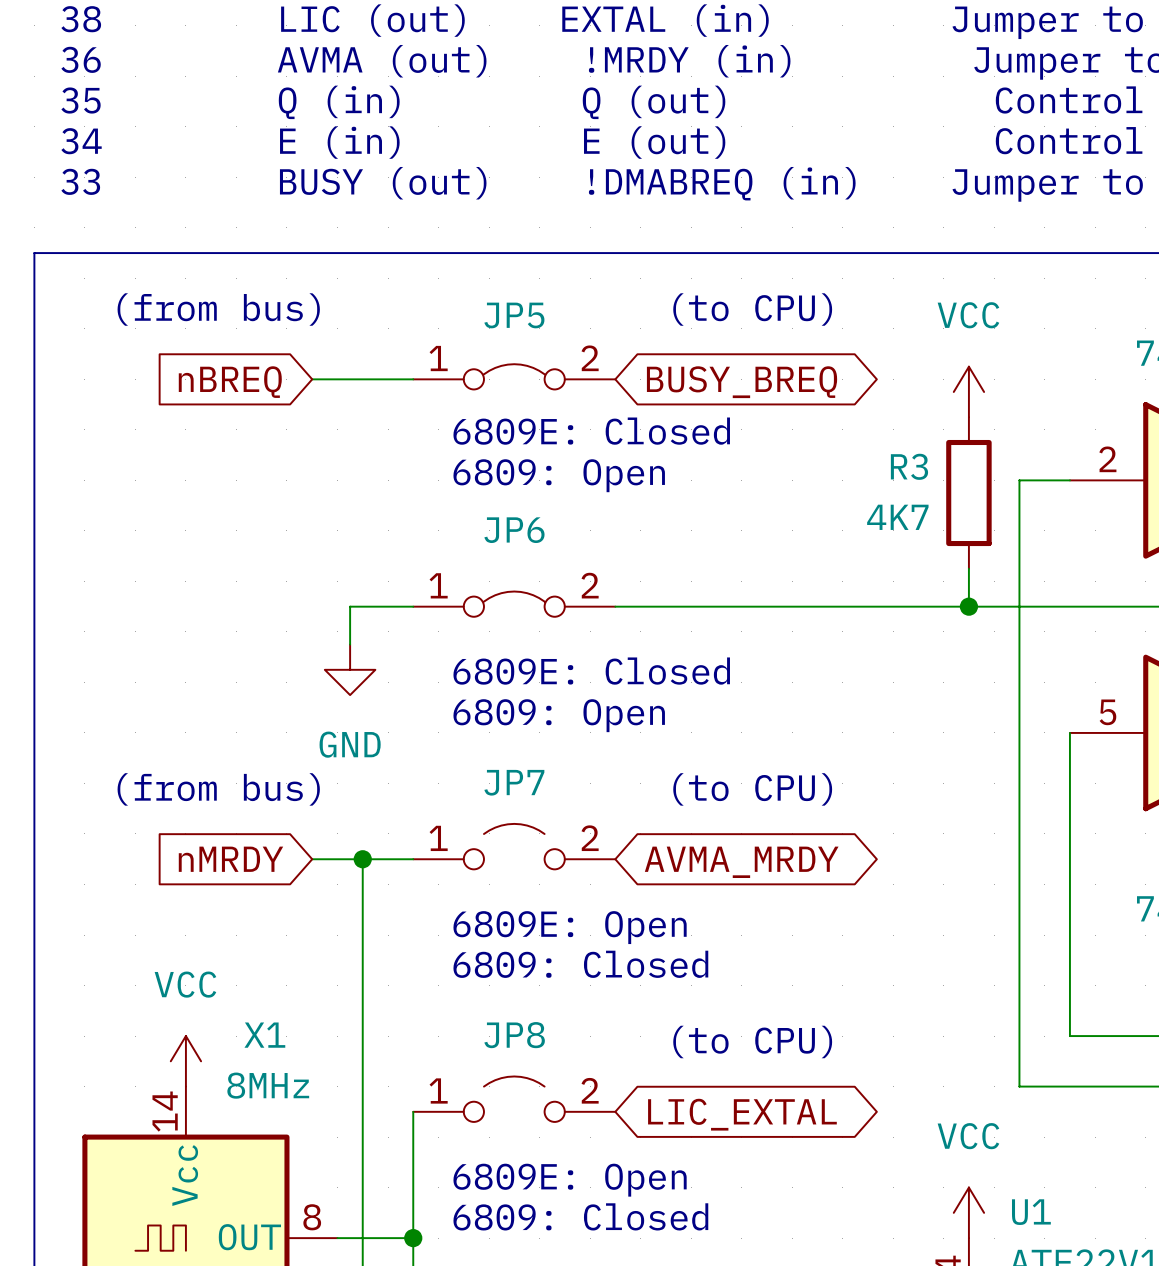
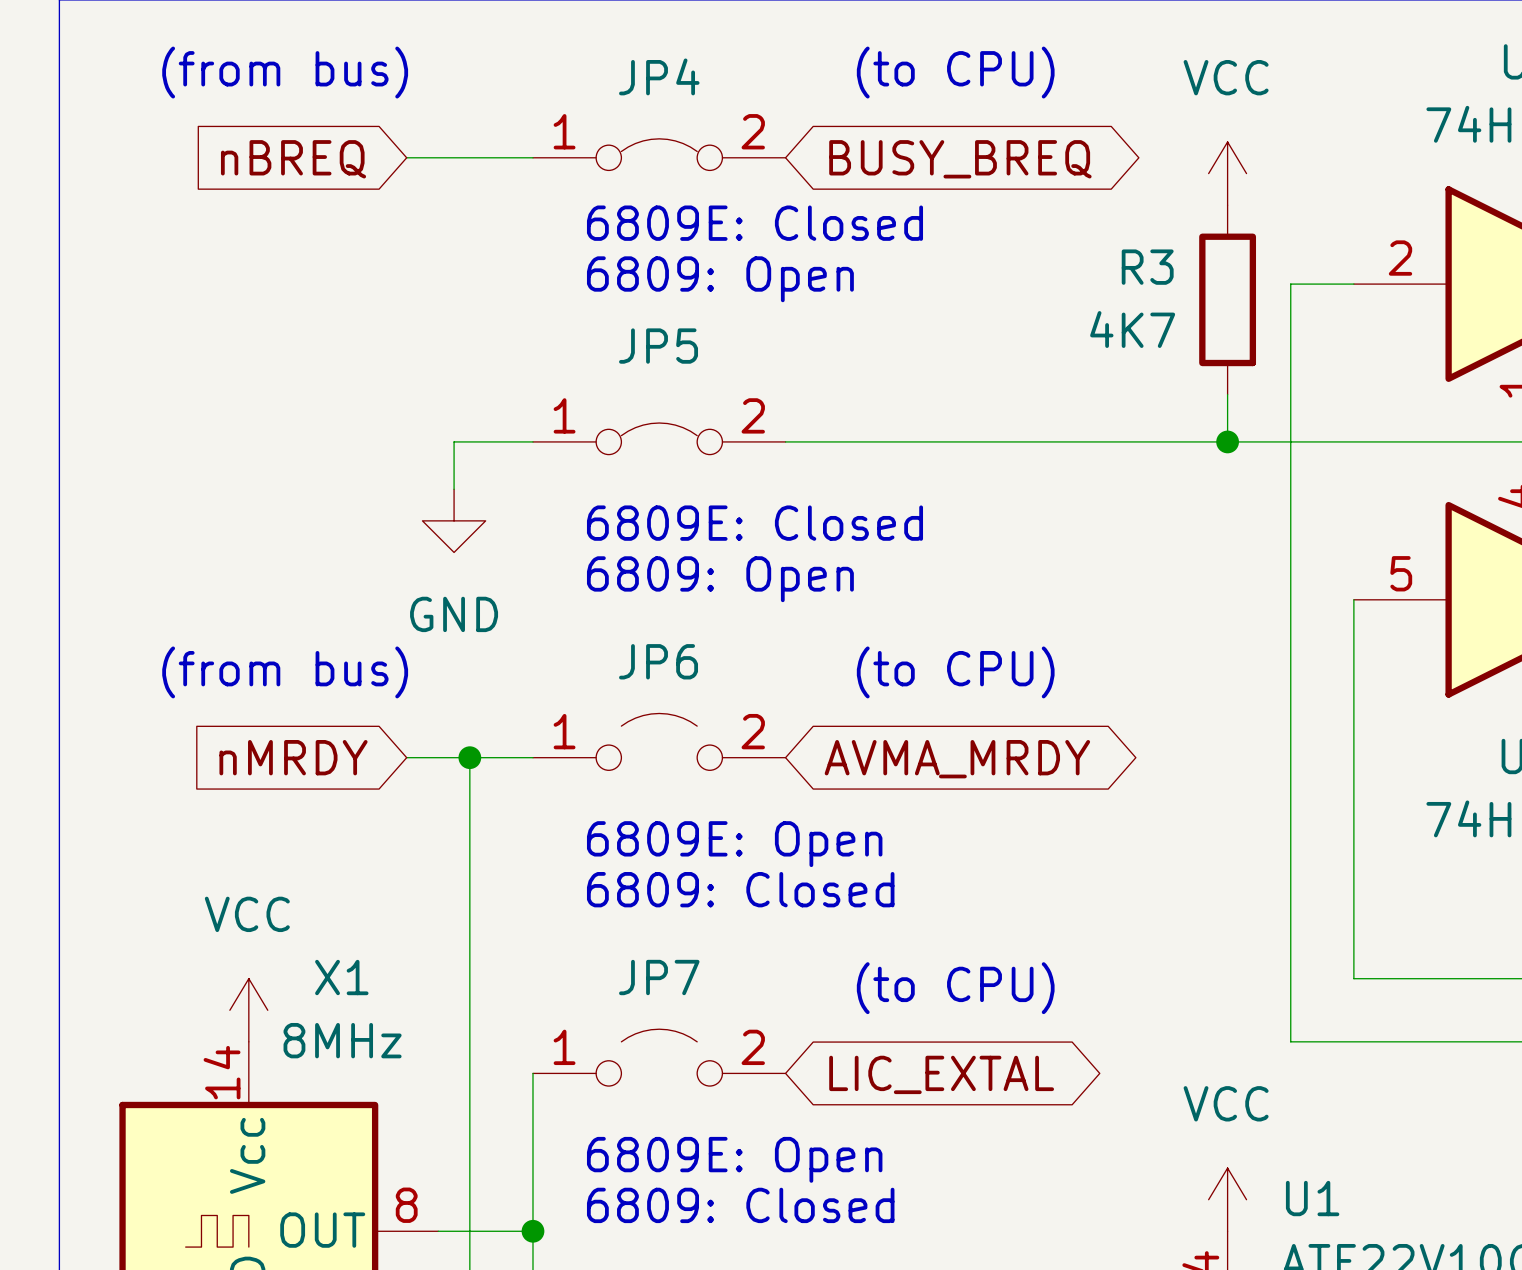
JP5 name: JP5 (514, 315) -> JP4 (659, 76)
JP6 name: JP6 (514, 530) -> JP5 (658, 346)
JP7 name: JP7 (514, 782) -> JP6 (658, 661)
JP8 name: JP8 (514, 1035) -> JP7 (659, 977)

